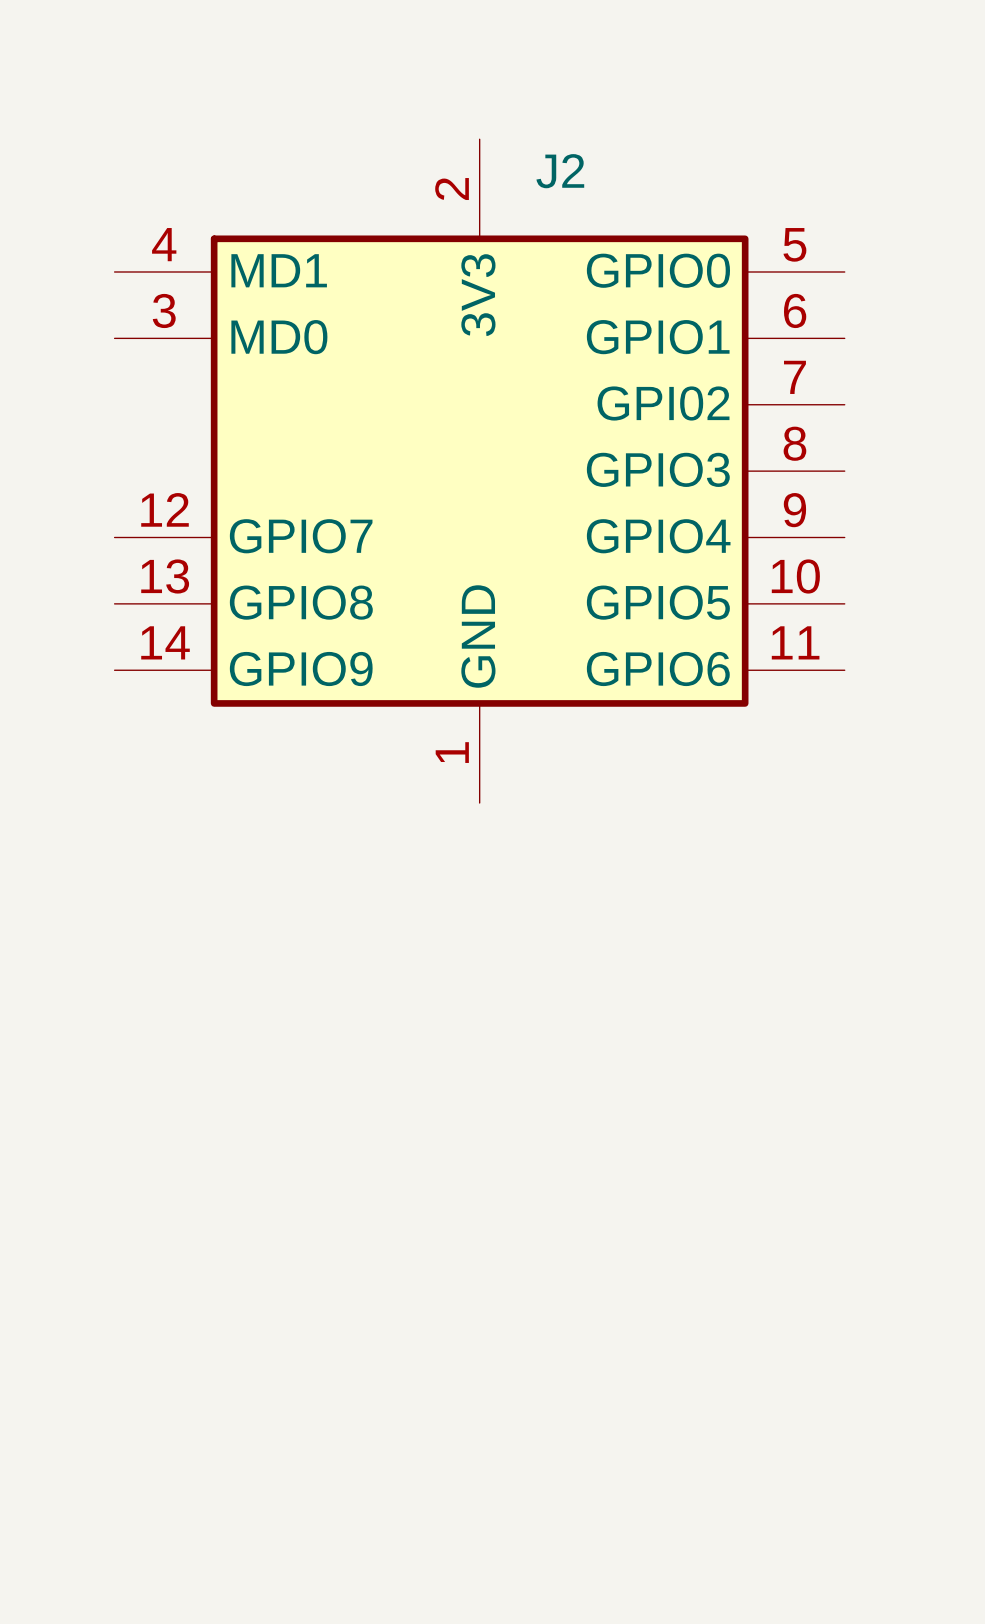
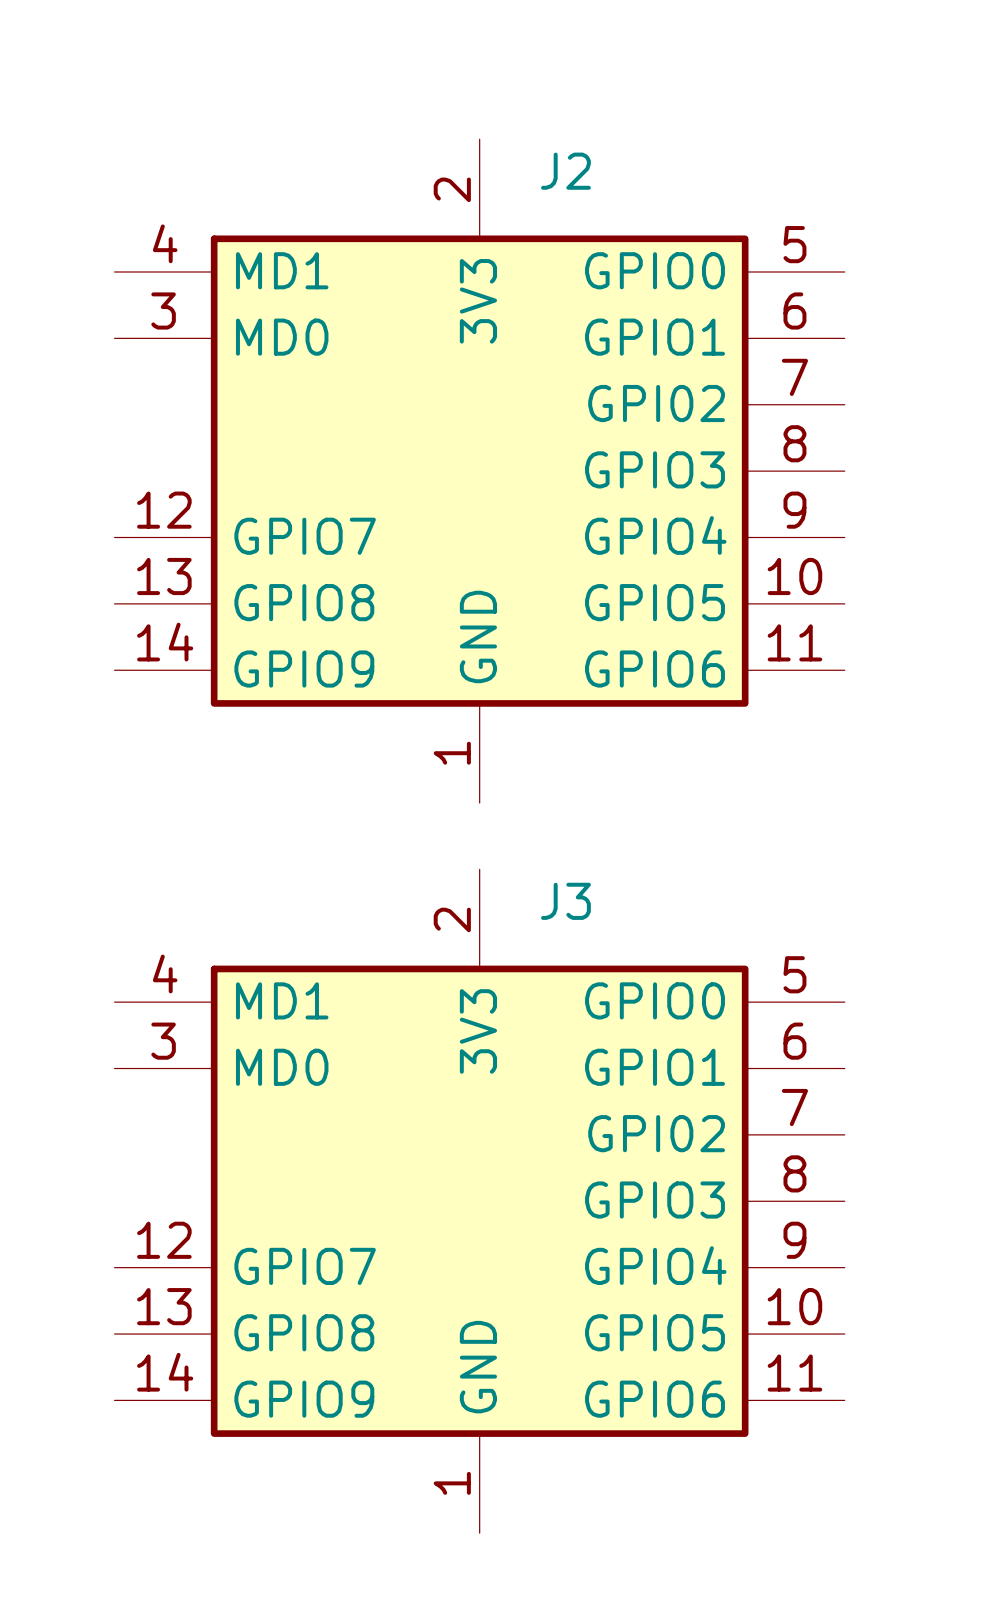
J3: none -> (479, 1201)

